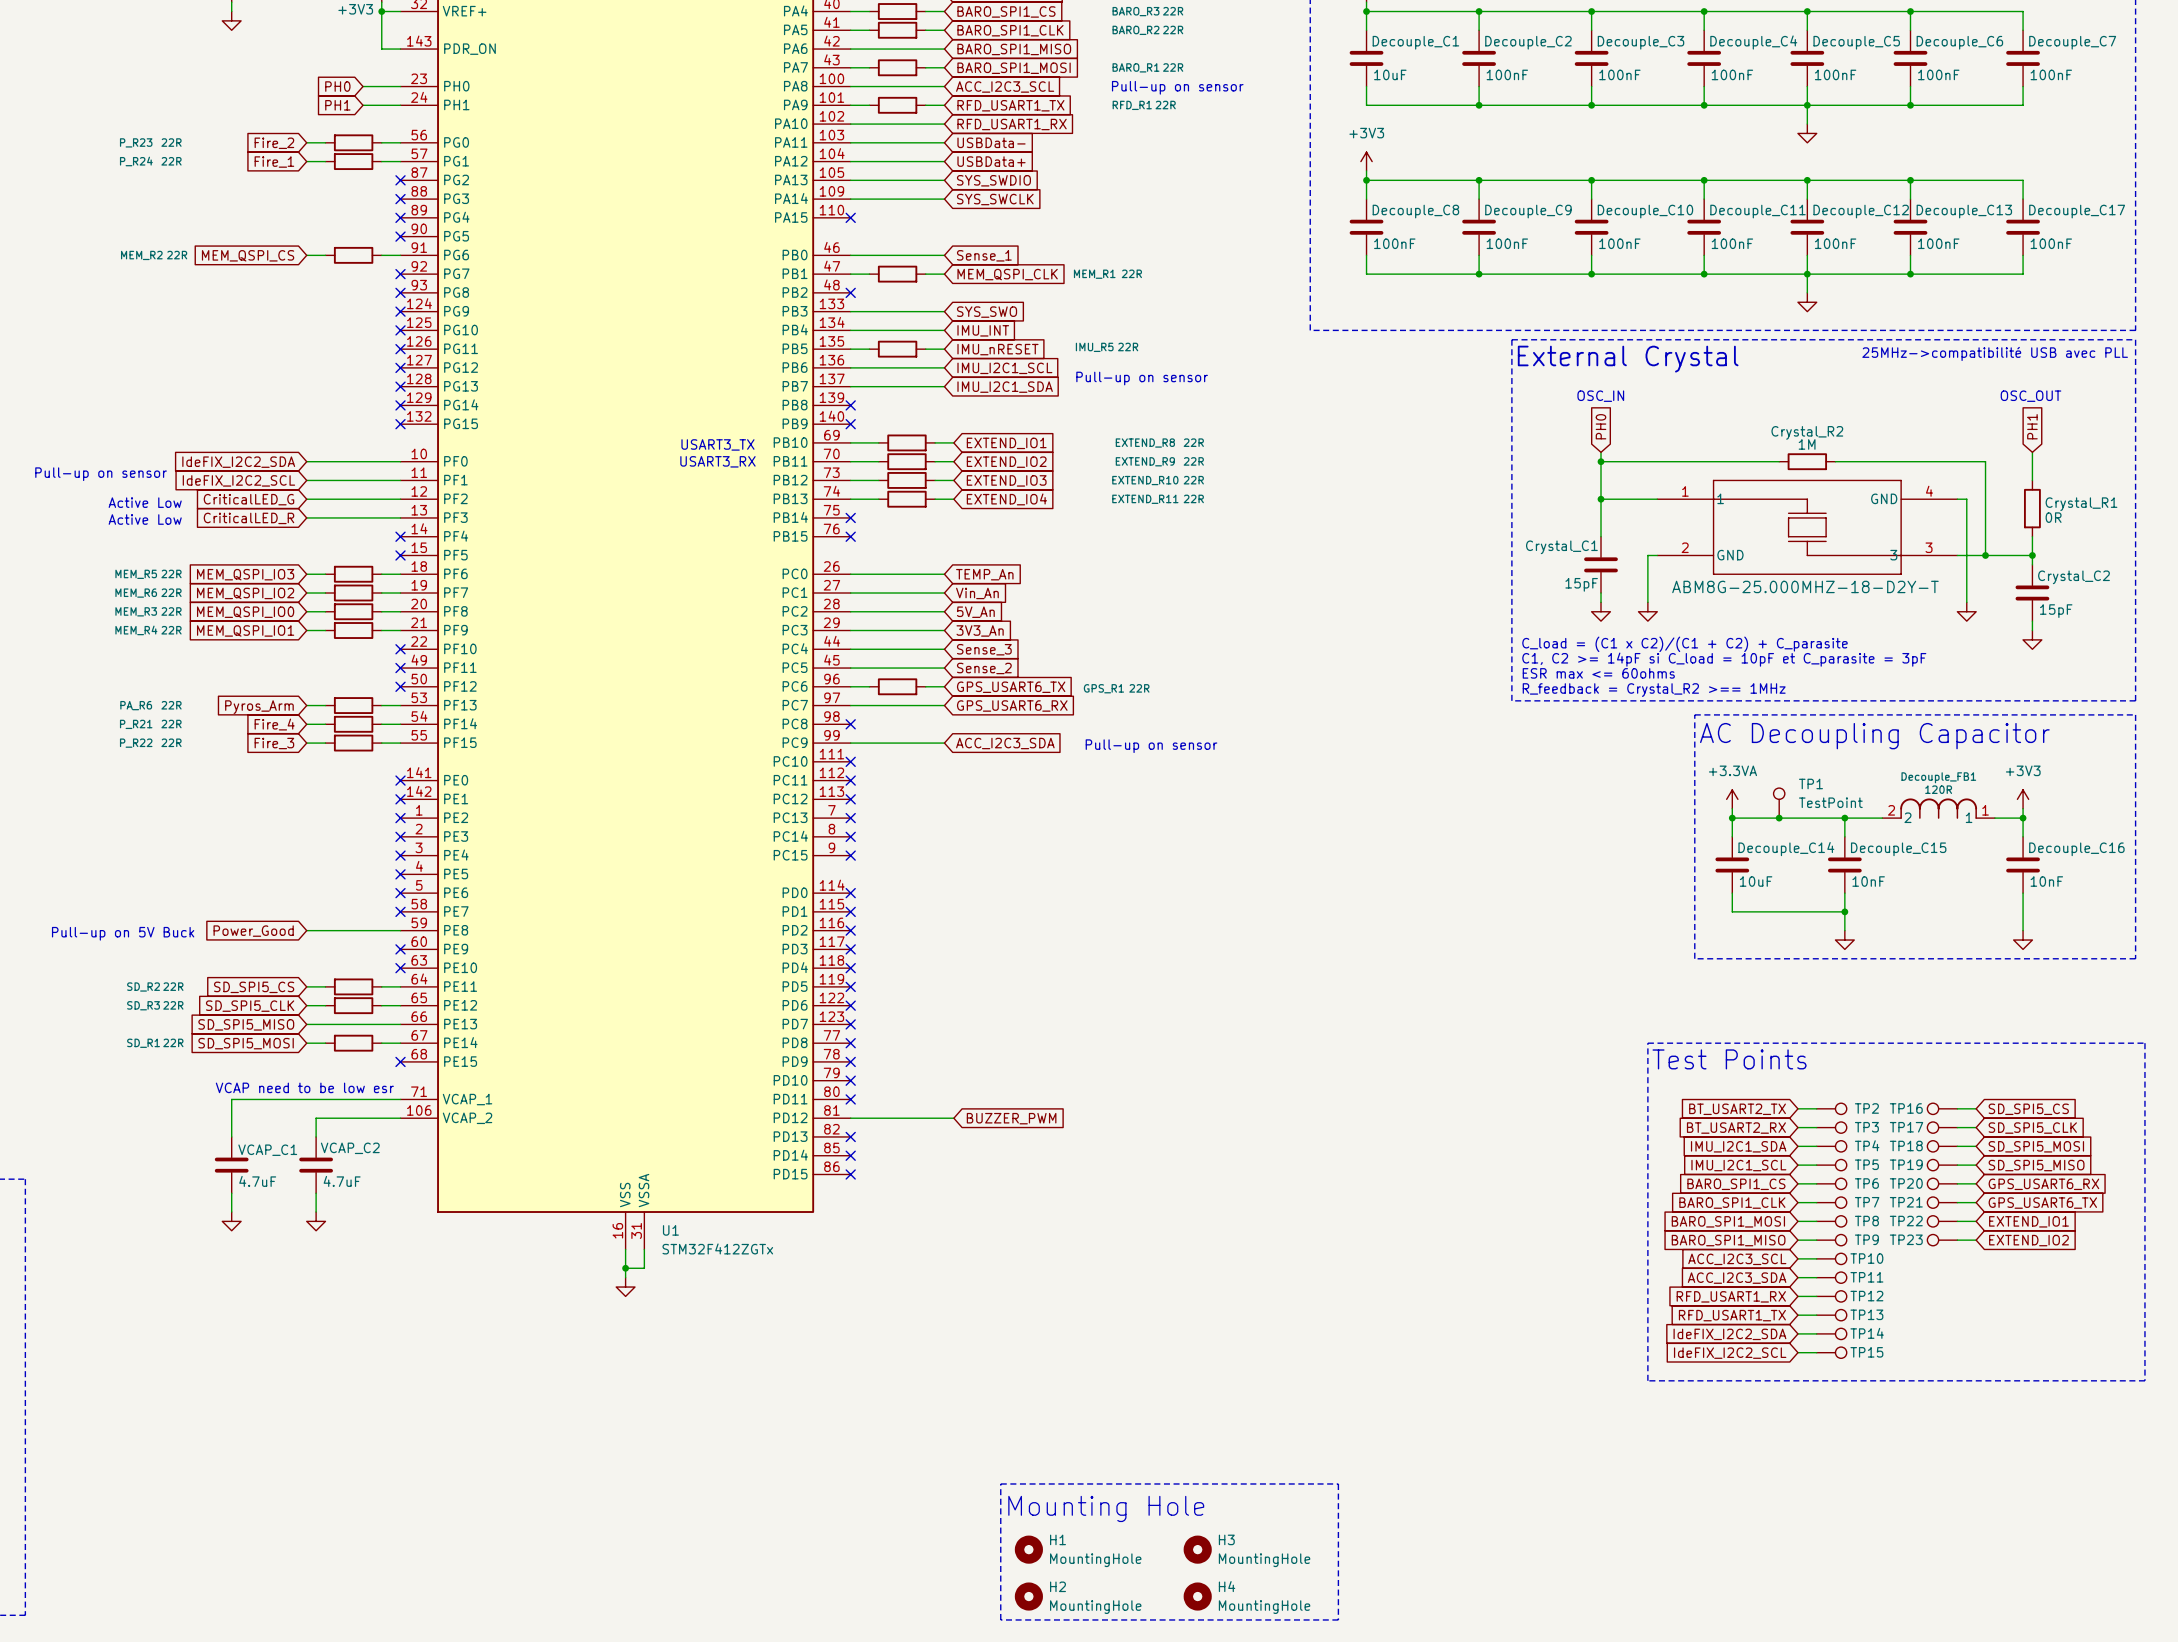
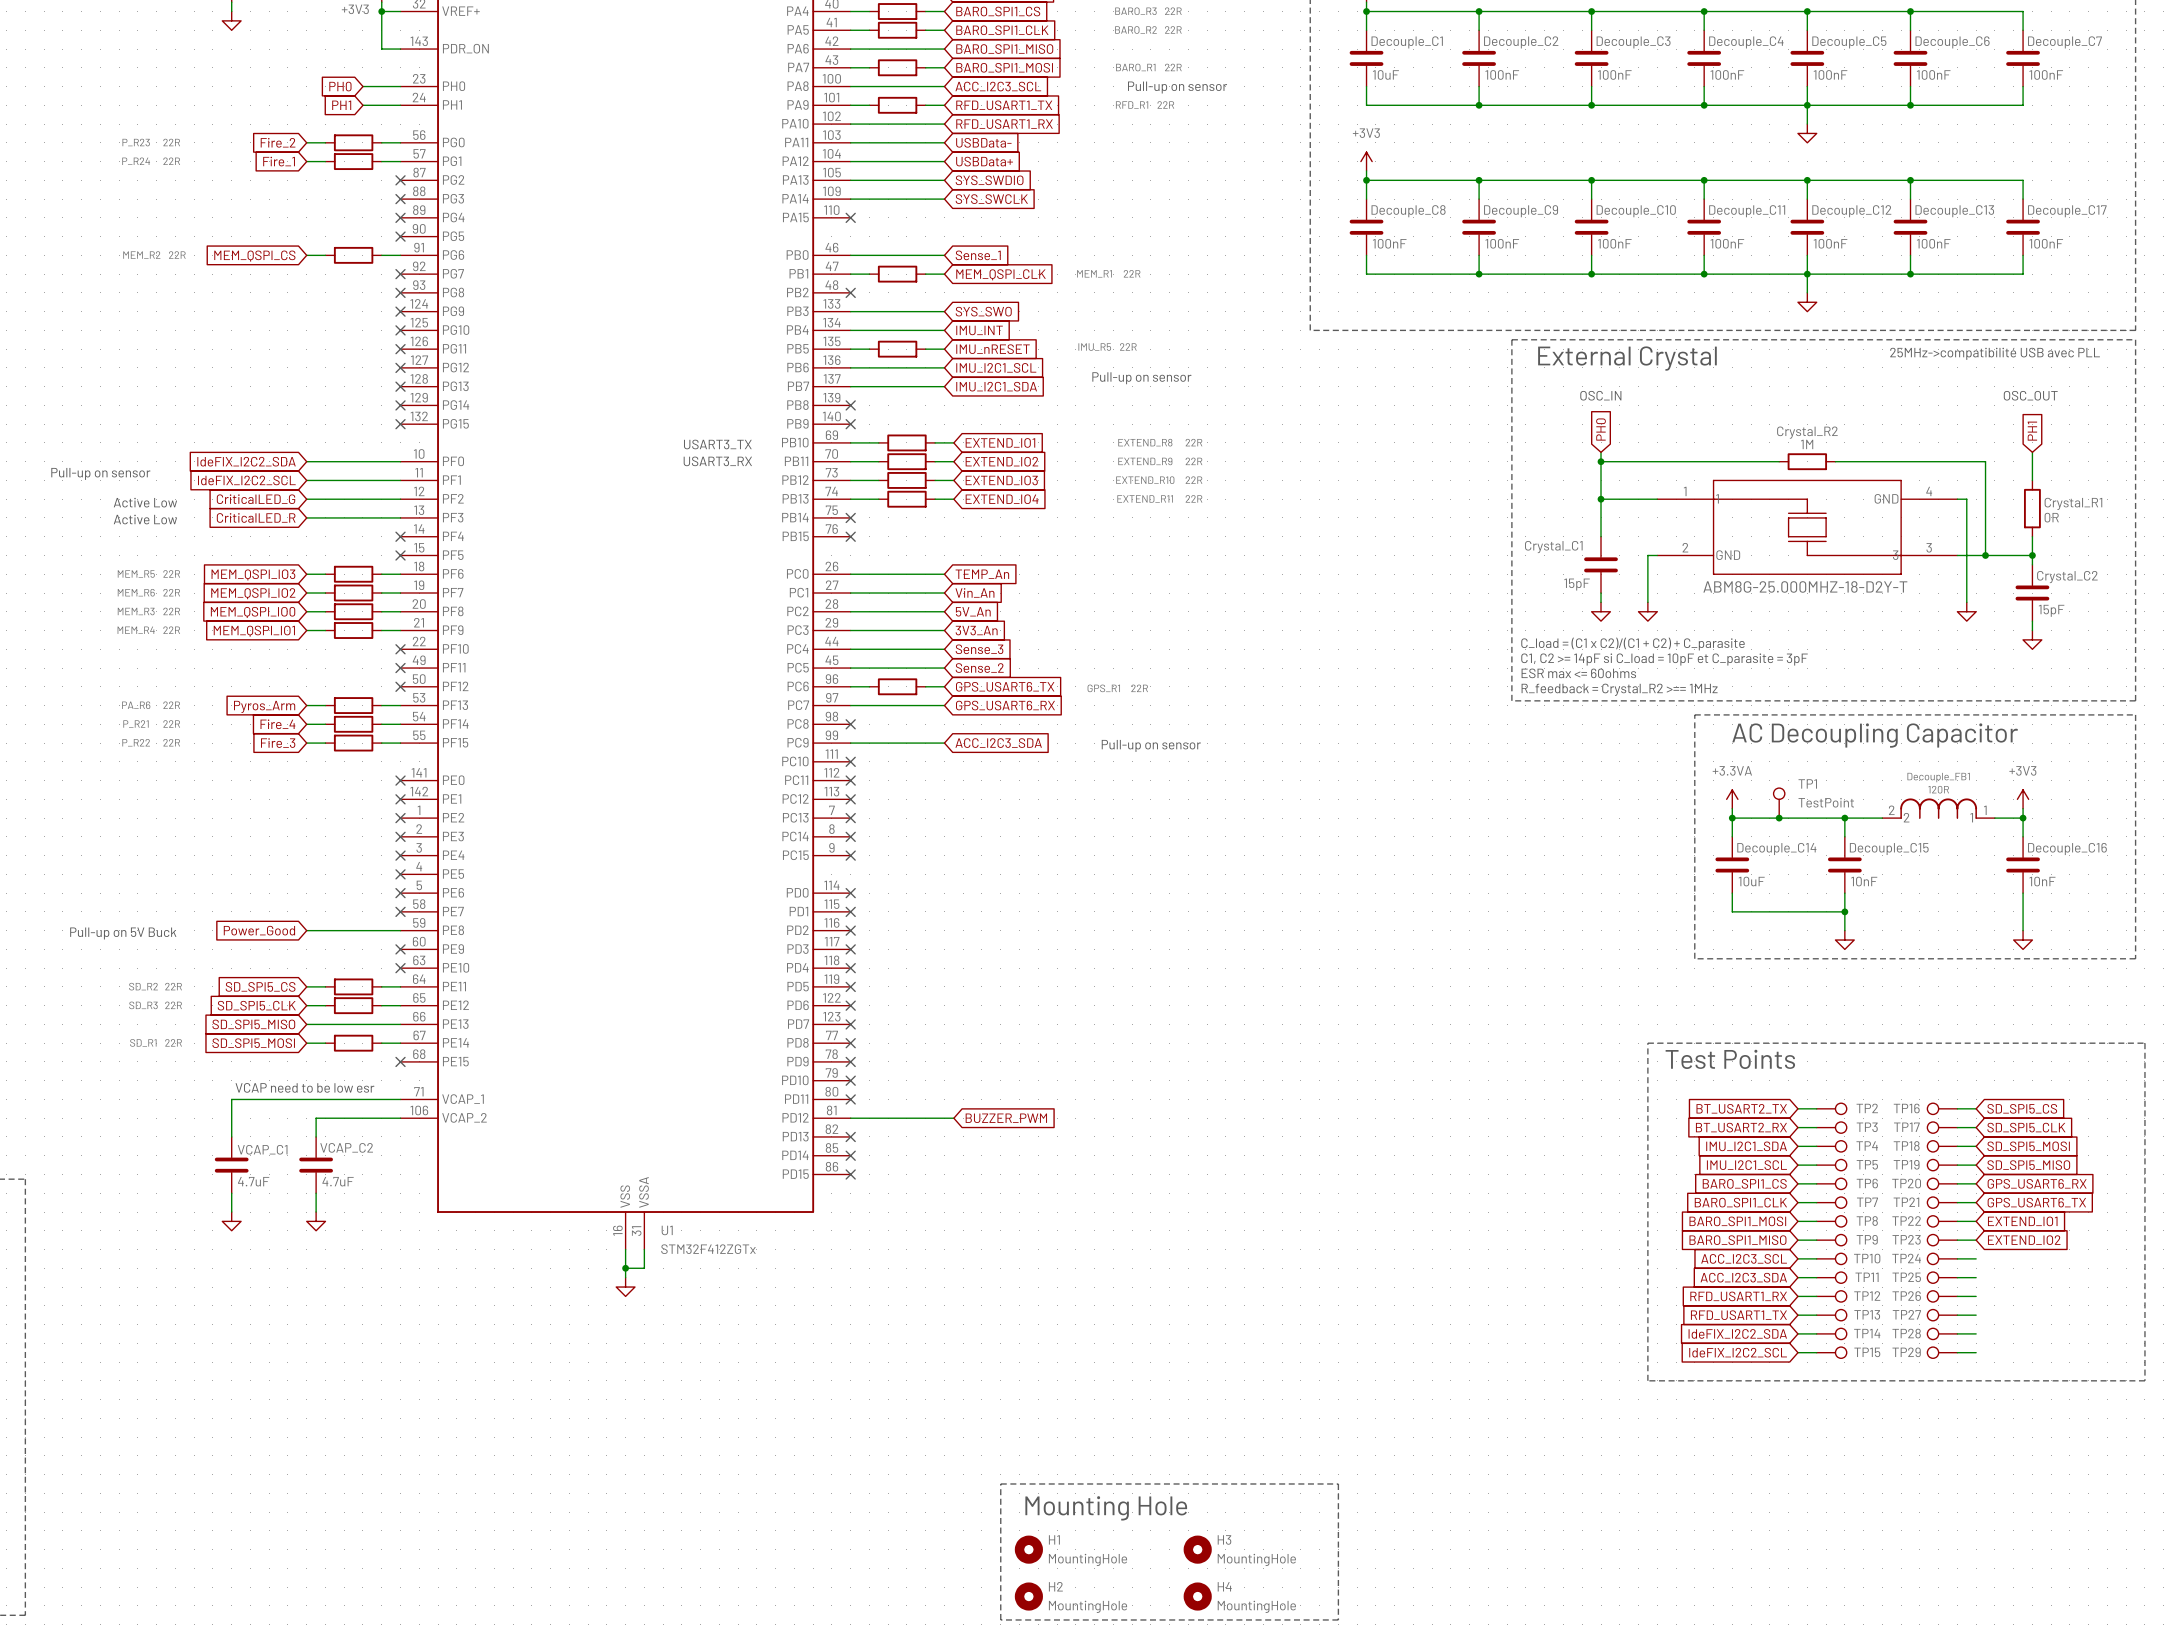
TP24: none -> (1942, 1258)
wire: none -> (1957, 1258) (1976, 1258)
TP25: none -> (1942, 1277)
wire: none -> (1957, 1277) (1976, 1277)
TP26: none -> (1942, 1296)
wire: none -> (1957, 1296) (1976, 1296)
TP27: none -> (1942, 1315)
wire: none -> (1957, 1315) (1976, 1315)
TP28: none -> (1942, 1333)
wire: none -> (1957, 1333) (1976, 1333)
TP29: none -> (1942, 1352)
wire: none -> (1957, 1352) (1976, 1352)

